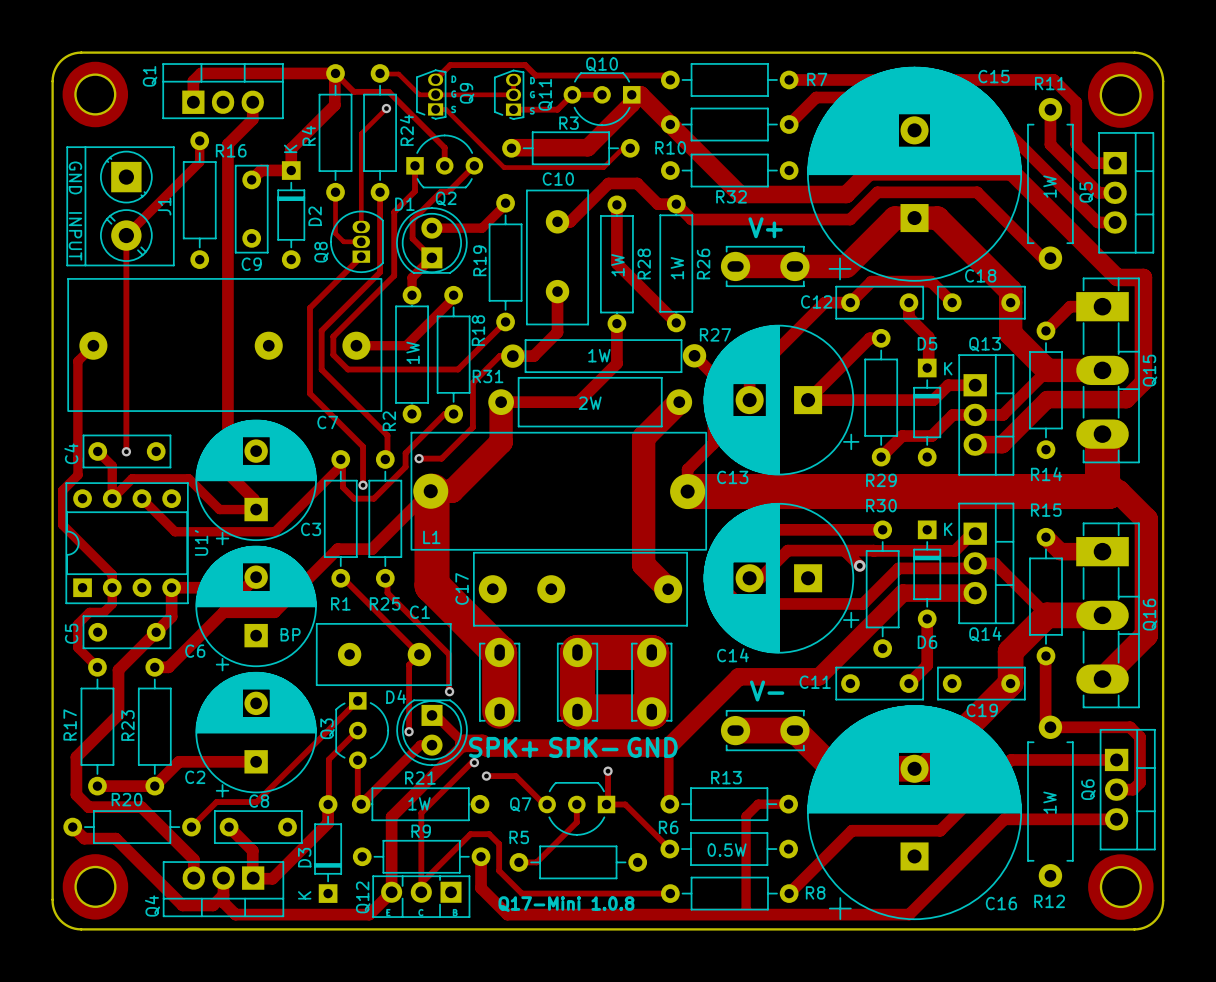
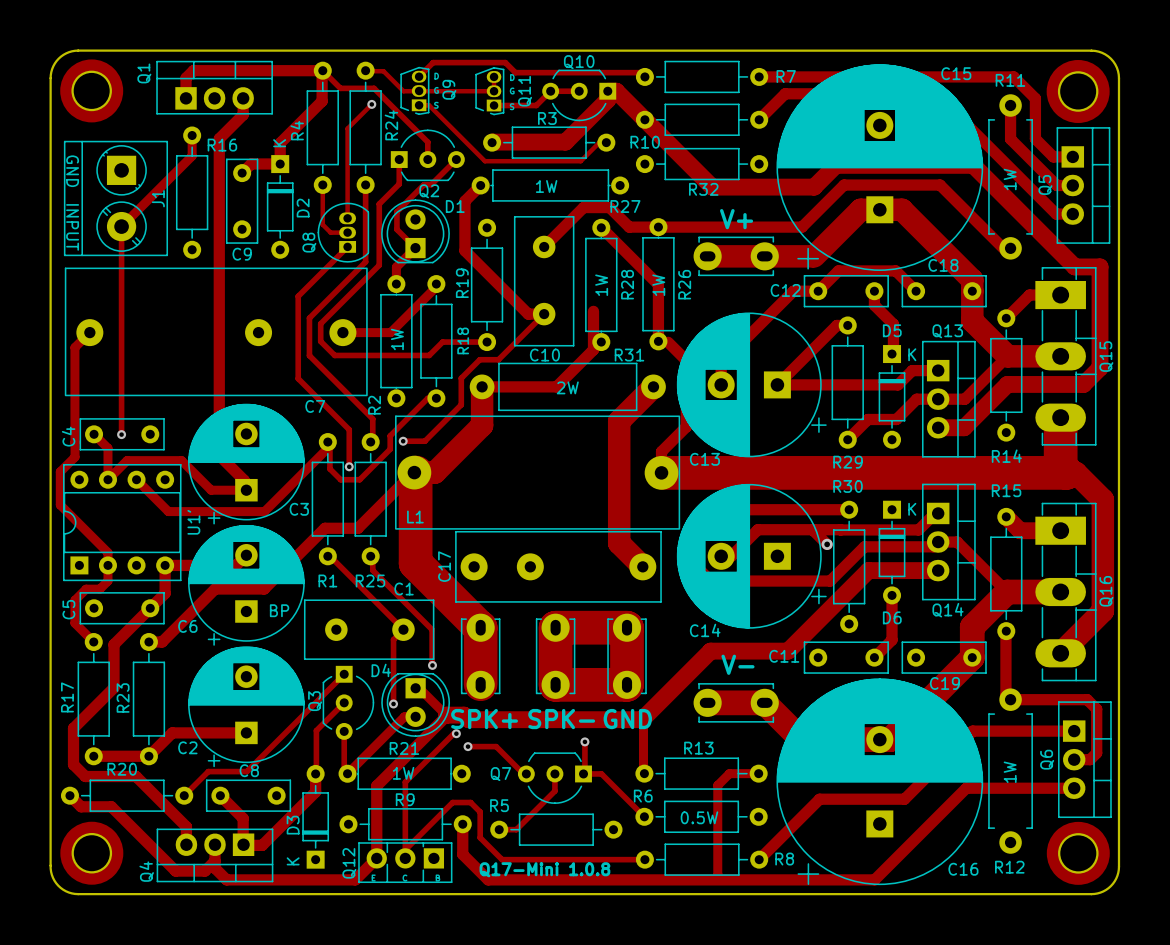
C10 name position: C10 (558, 179) -> C10 (544, 355)
text: none -> 1W (546, 186)
track: (505, 203) (482, 228) (431, 228) -> none
D1 name position: D1 (404, 204) -> D1 (455, 206)
track: (616, 204) (616, 263) (676, 322) -> none
track: (850, 219) (691, 219) (676, 204) (657, 204) (637, 183) (608, 183) (570, 221) (557, 221) -> (817, 211) (802, 227) (629, 227) (609, 207) (583, 207) (544, 246)
track: none -> (601, 227) (658, 284) (658, 341)
C10 position: (557, 257) -> (544, 281)
R19 position: (505, 262) -> (487, 284)
R26 position: (676, 263) -> (658, 284)
R28 position: (616, 264) -> (601, 284)
text position: 1W (617, 265) -> 1W (601, 285)
text position: 1W (677, 268) -> 1W (658, 285)
track: (557, 291) (557, 332) (533, 356) (499, 356) (472, 382) (472, 427) -> (480, 185) (464, 201) (464, 250) (528, 314) (544, 314) (498, 359) (479, 359) (461, 378) (461, 404) (454, 411)
track: (505, 321) (458, 369) (446, 369) -> (487, 342) (442, 342) (429, 355)
R18 name position: R18 (478, 330) -> R18 (463, 340)
R27 name position: R27 (715, 334) -> R27 (625, 206)
R27 footprint: [501, 339, 707, 373] -> [471, 169, 630, 202]
text: 1W (599, 355) -> none
R31 name position: R31 (488, 376) -> R31 (629, 355)

